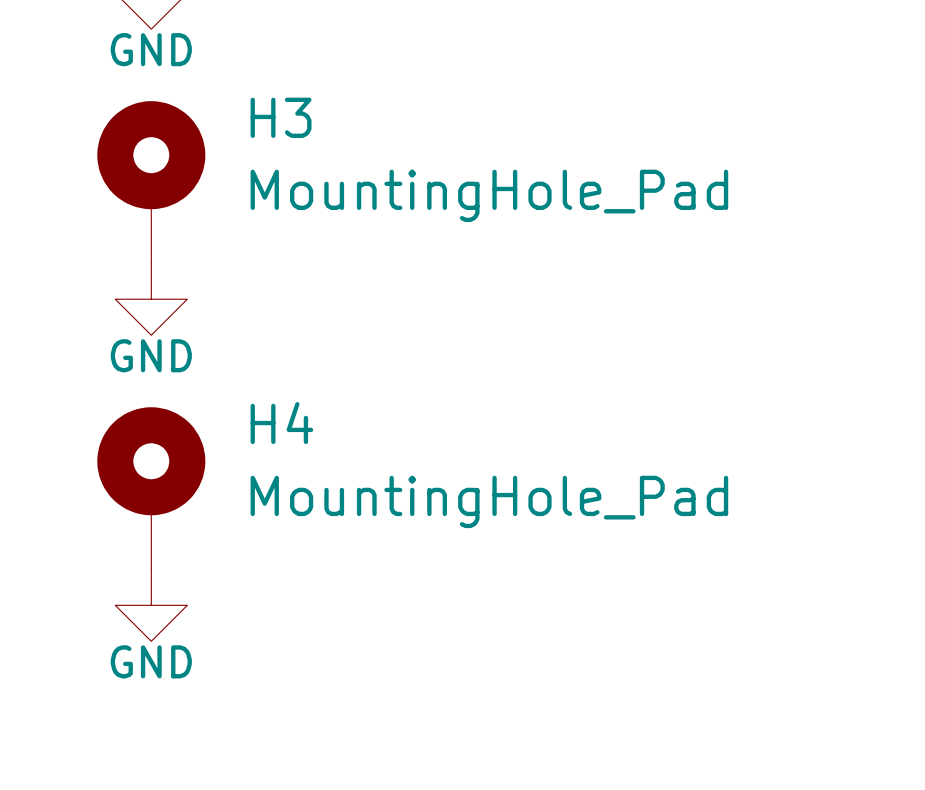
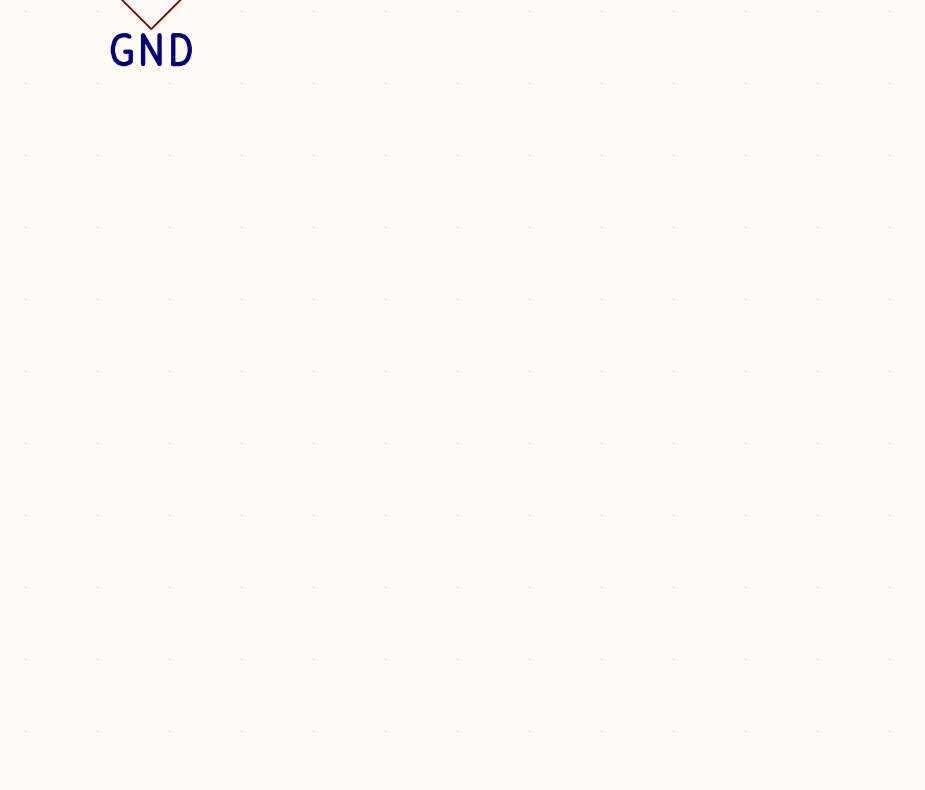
H3: MountingHole_Pad (151, 182) -> none
power symbol: GND (151, 299) -> none
H4: MountingHole_Pad (151, 488) -> none
power symbol: GND (151, 605) -> none

